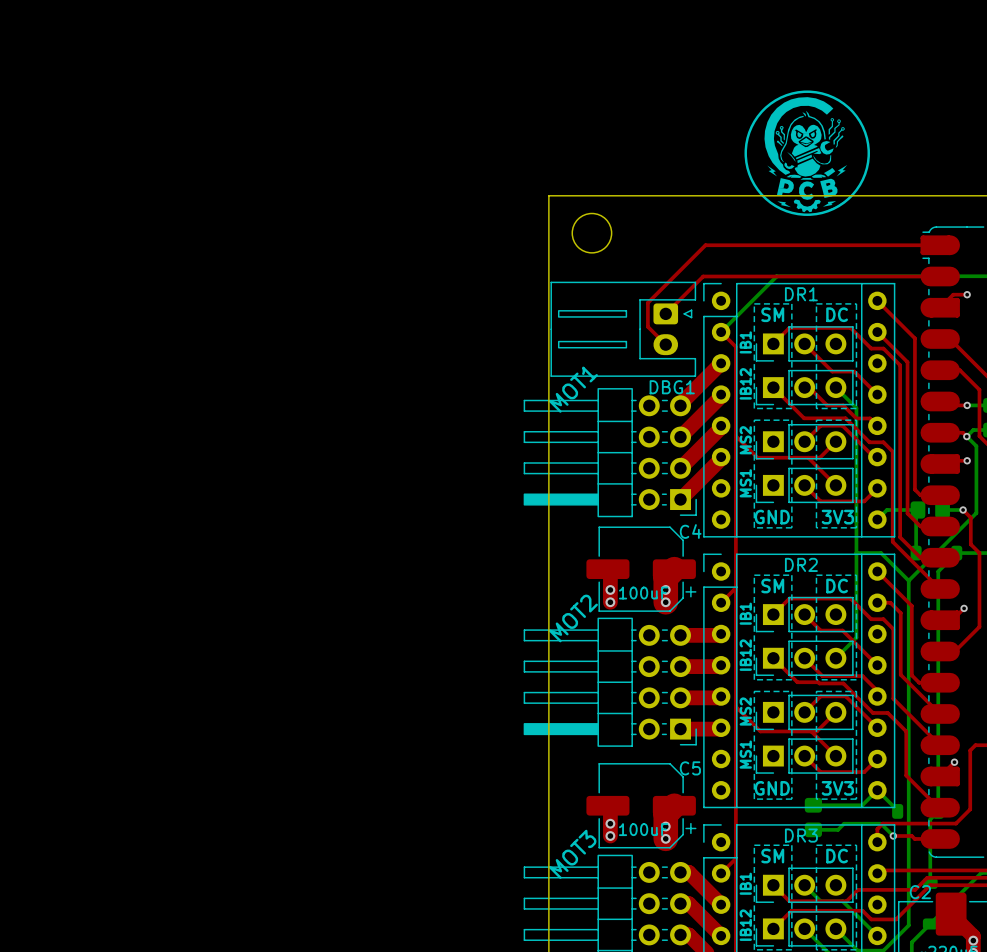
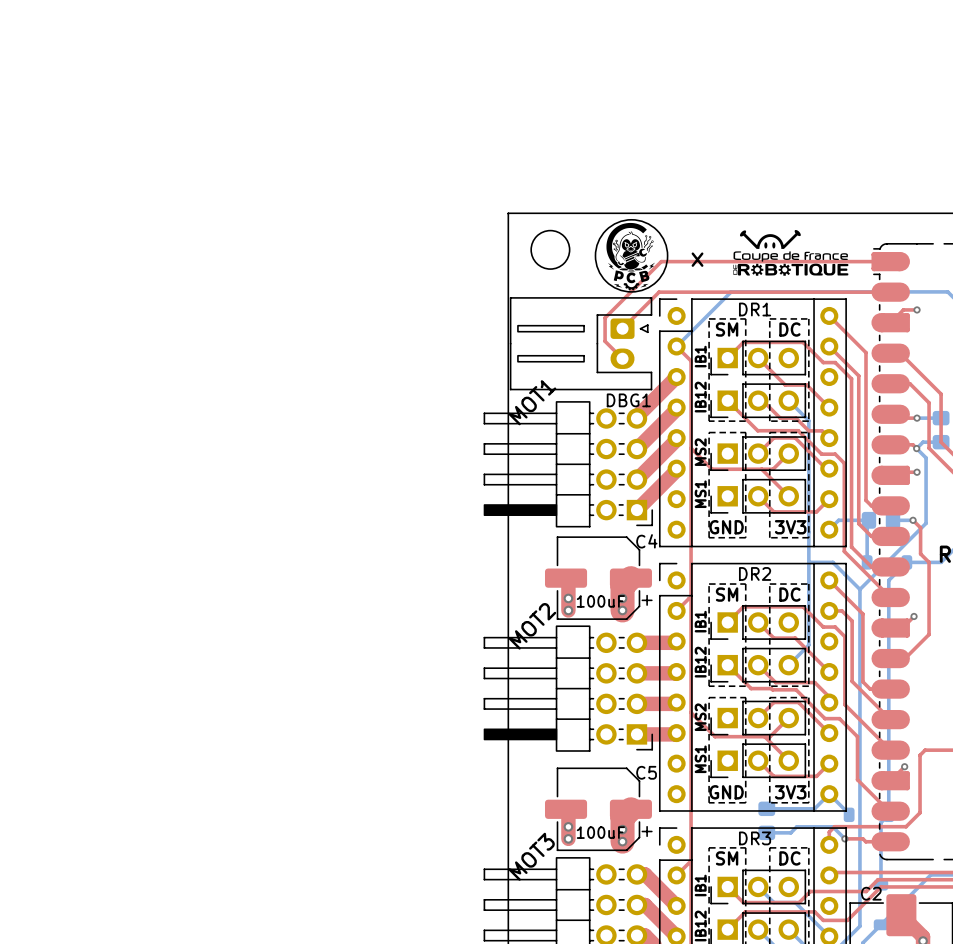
drawing: [744, 90, 870, 216] -> none
drawing: none -> [594, 219, 669, 293]
drawing: none -> [733, 230, 849, 276]
text: none -> x (697, 259)

